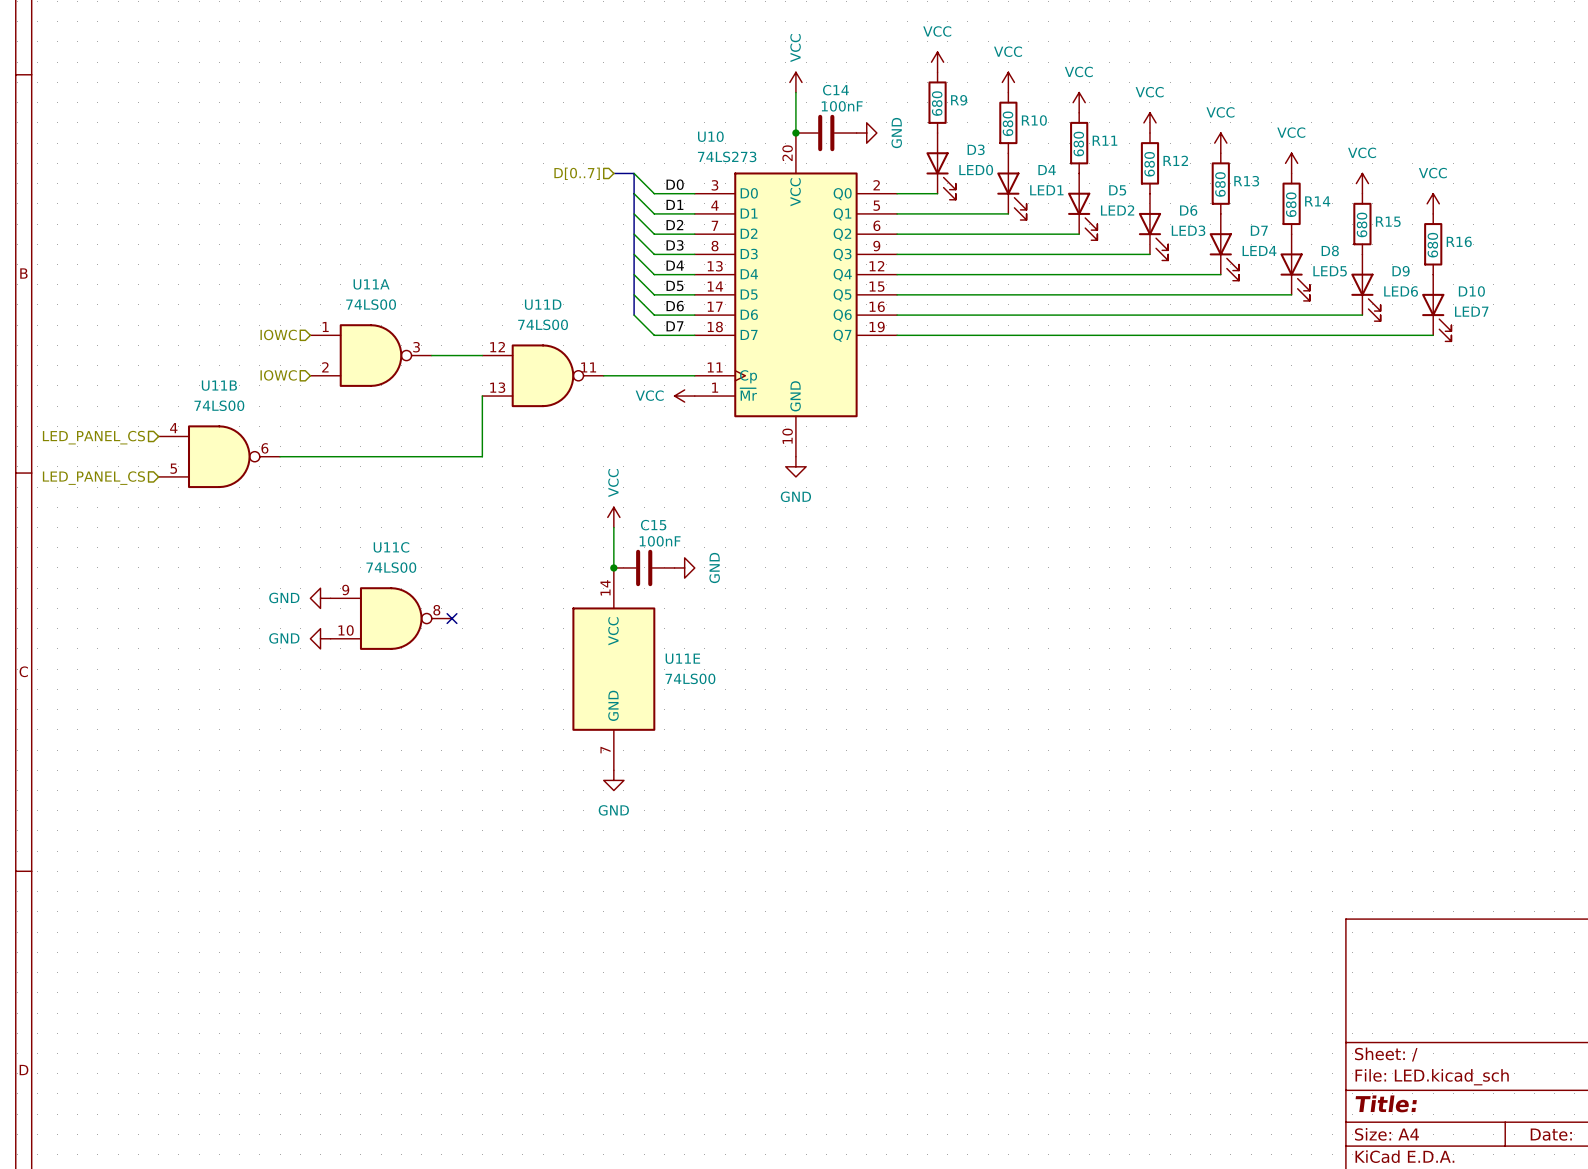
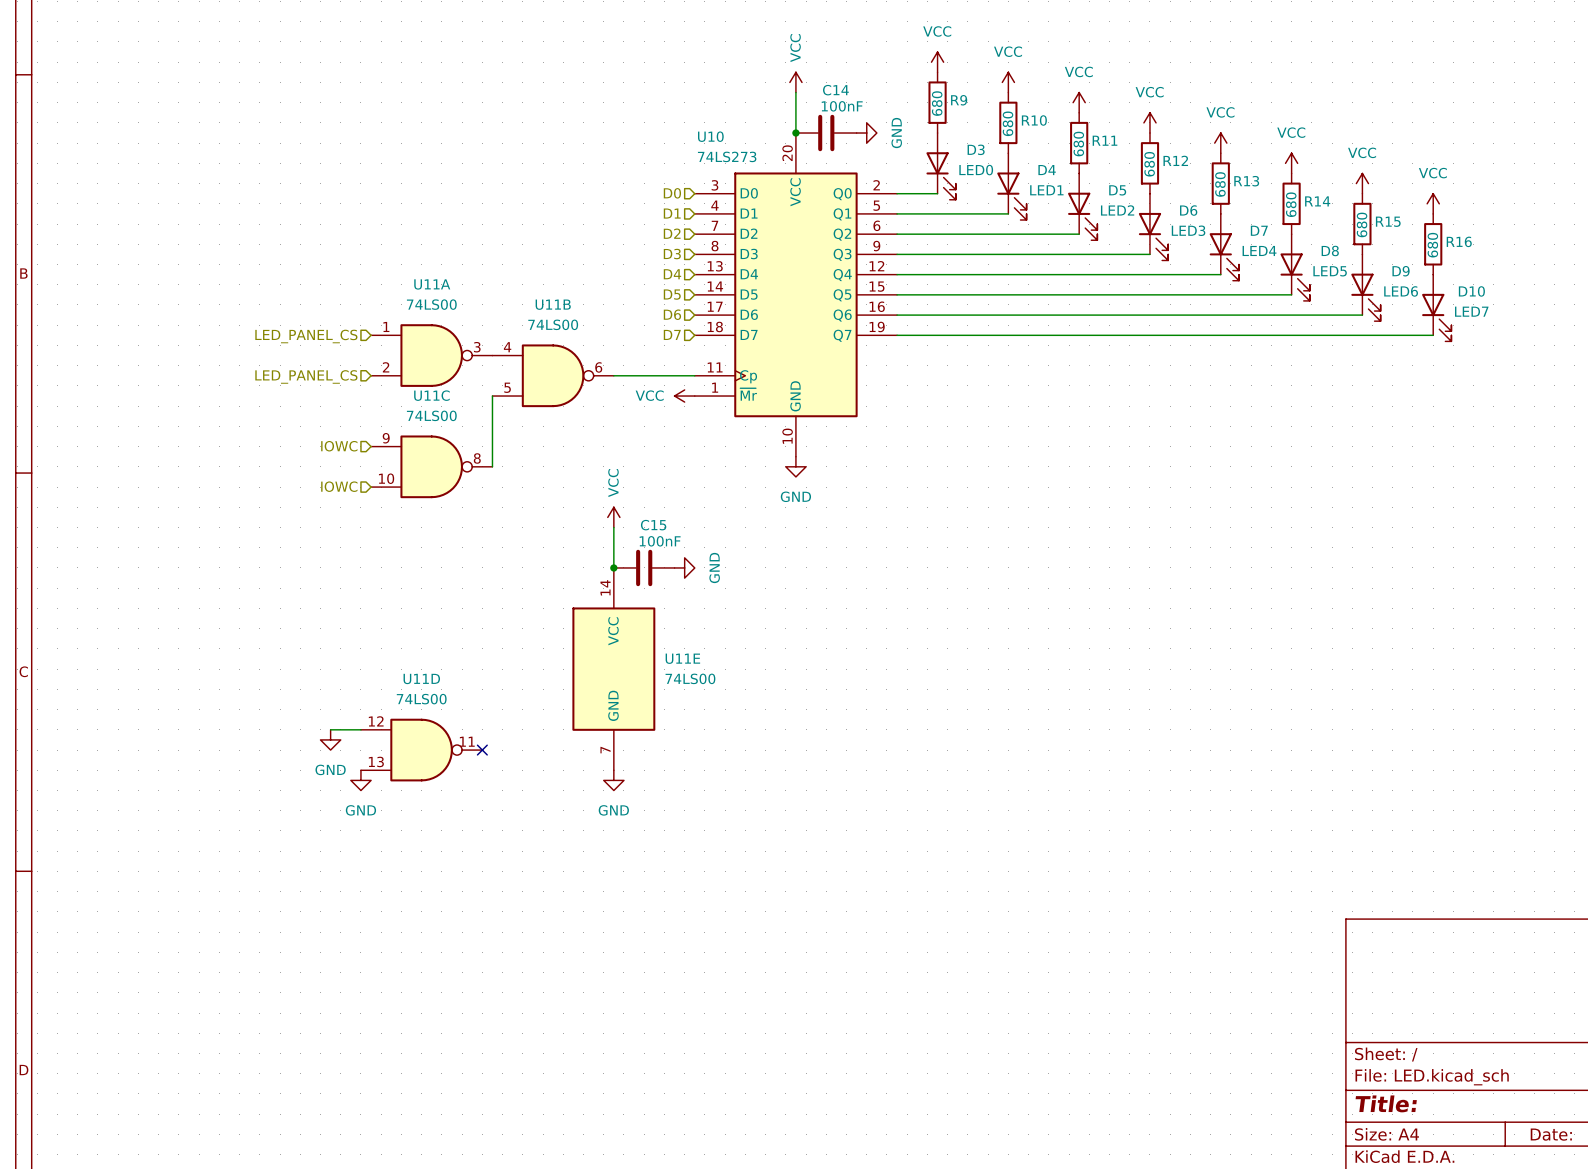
hierarchical label: D[0..7] (577, 173) -> none
bus: (613, 173) (634, 173) (634, 315) -> none
wire: (634, 173) (654, 193) (694, 193) -> none
label: D0 (675, 184) -> none
wire: (634, 193) (654, 213) (694, 213) -> none
hierarchical label: none -> D0 (672, 193)
label: D1 (674, 204) -> none
wire: (634, 213) (654, 234) (694, 234) -> none
hierarchical label: none -> D1 (672, 213)
label: D2 (674, 225) -> none
hierarchical label: none -> D2 (672, 233)
wire: (634, 234) (654, 254) (694, 254) -> none
label: D3 (675, 245) -> none
wire: (634, 254) (654, 274) (694, 274) -> none
hierarchical label: none -> D3 (672, 254)
label: D4 (675, 265) -> none
wire: (634, 274) (654, 294) (694, 294) -> none
hierarchical label: none -> D4 (672, 274)
label: D5 (674, 285) -> none
wire: (634, 294) (654, 315) (694, 315) -> none
hierarchical label: none -> D5 (672, 294)
label: D6 (675, 306) -> none
hierarchical label: none -> D6 (672, 314)
wire: (634, 315) (654, 335) (694, 335) -> none
label: D7 (674, 326) -> none
hierarchical label: IOWC (278, 334) -> none
hierarchical label: none -> D7 (672, 334)
hierarchical label: none -> LED_PANEL_CS (306, 336)
U11A position: (371, 355) -> (431, 355)
hierarchical label: IOWC (278, 375) -> none
U11D position: (543, 375) -> (421, 750)
hierarchical label: none -> LED_PANEL_CS (306, 376)
wire: (482, 396) (482, 456) (280, 456) -> none
wire: none -> (492, 396) (492, 466)
hierarchical label: LED_PANEL_CS (93, 437) -> none
hierarchical label: none -> IOWC (339, 446)
U11B position: (219, 456) -> (553, 375)
hierarchical label: LED_PANEL_CS (93, 478) -> none
hierarchical label: none -> IOWC (339, 486)
power symbol: GND (320, 598) -> none
U11C position: (391, 618) -> (431, 466)
no-connect mark: (452, 618) -> none
power symbol: GND (320, 638) -> none
wire: none -> (330, 729) (360, 729)
power symbol: none -> GND (330, 739)
no-connect mark: none -> (482, 750)
power symbol: none -> GND (360, 780)

